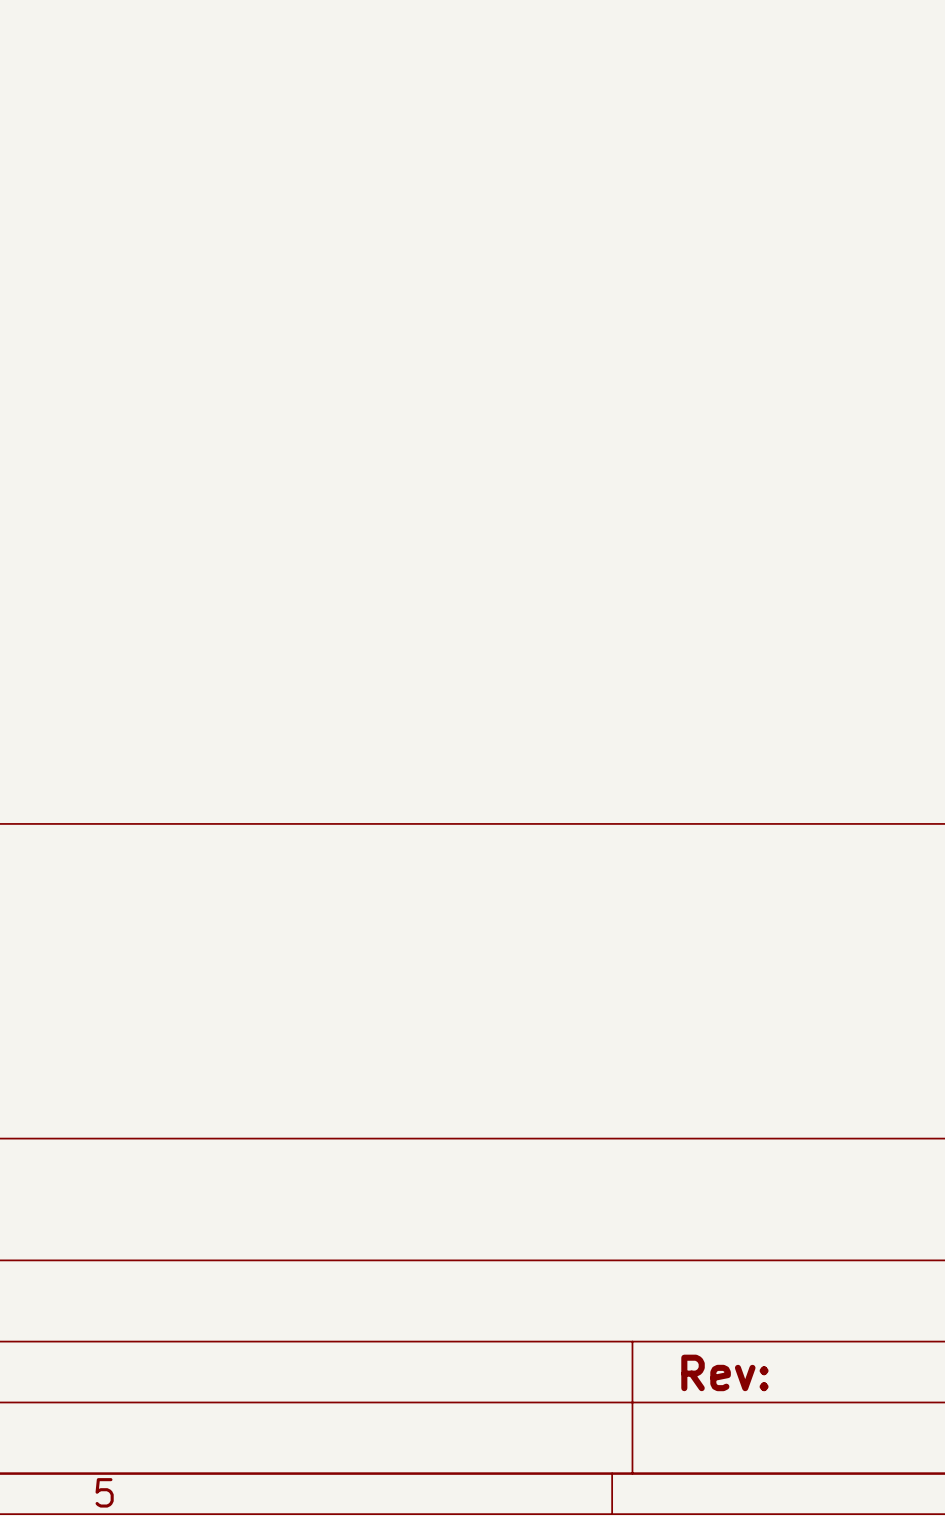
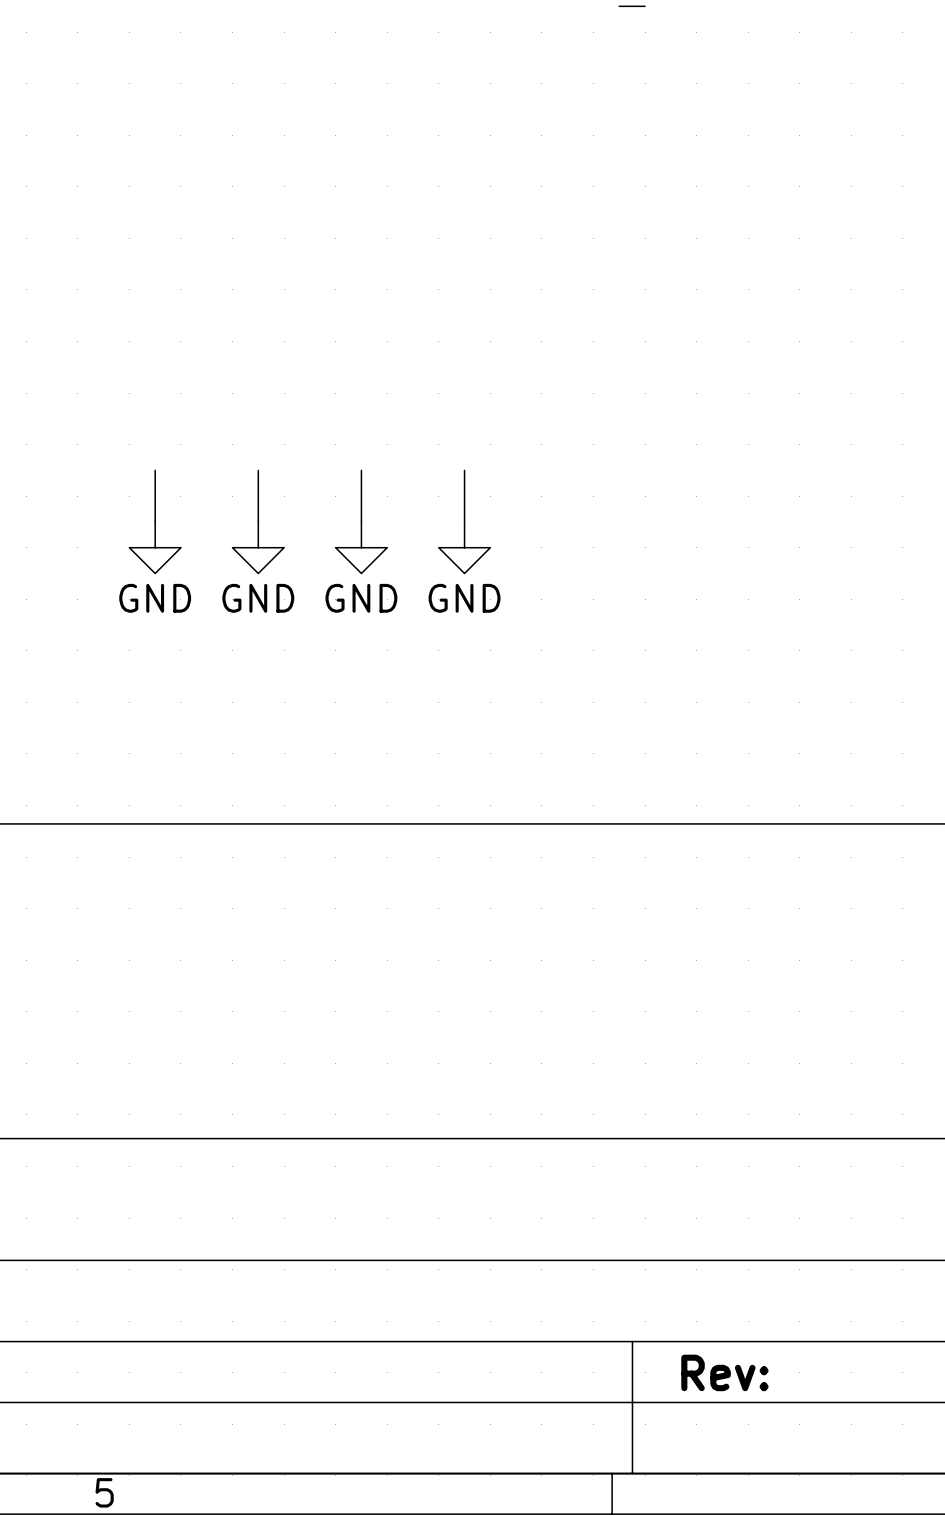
wire: none -> (619, 6) (645, 6)
wire: none -> (155, 470) (155, 521)
wire: none -> (258, 470) (258, 521)
wire: none -> (361, 470) (361, 521)
wire: none -> (464, 470) (464, 521)
power symbol: none -> GND (155, 547)
power symbol: none -> GND (258, 547)
power symbol: none -> GND (361, 547)
power symbol: none -> GND (464, 547)

